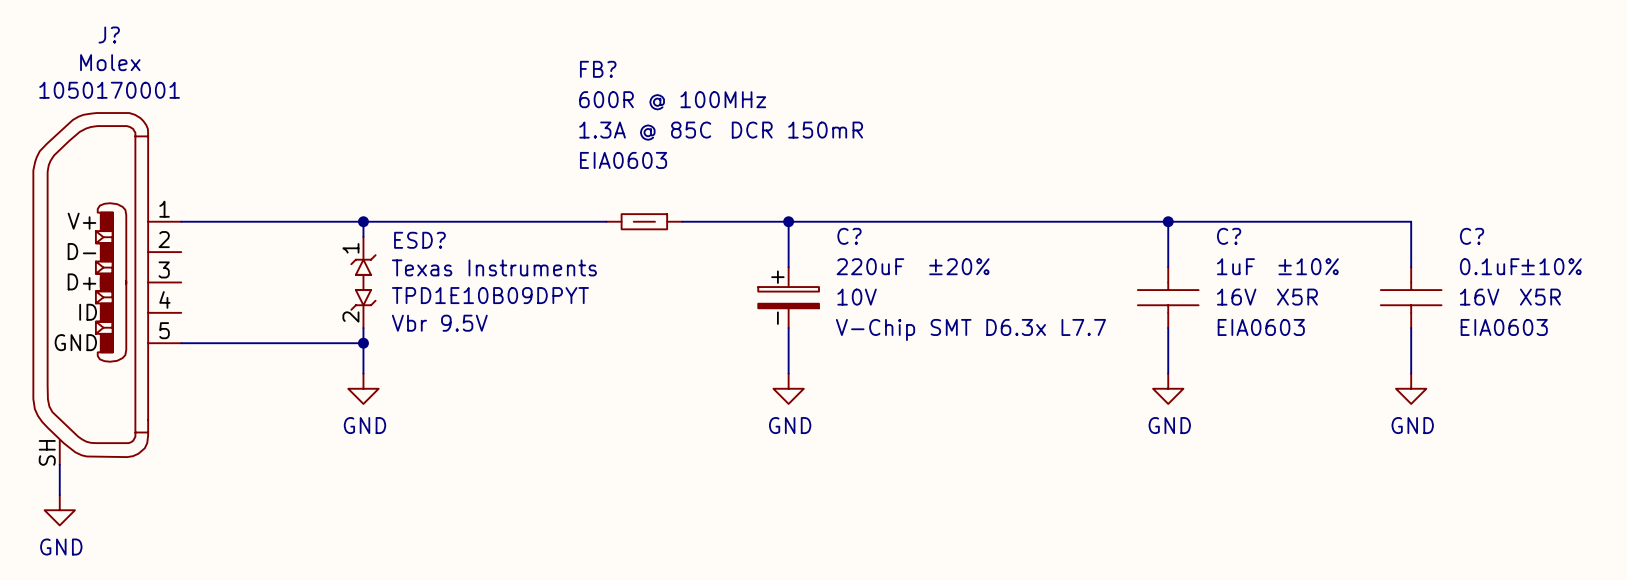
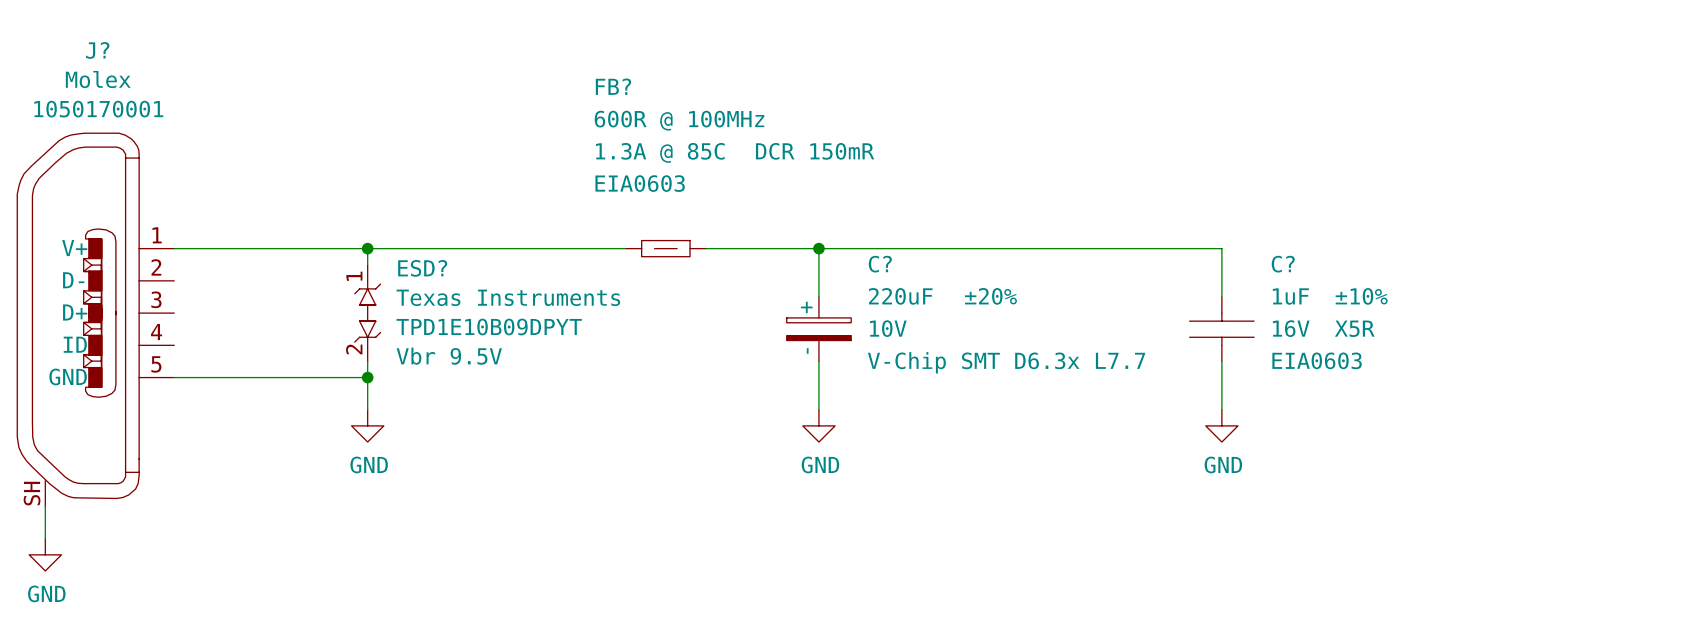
wire: (1168, 221) (1411, 221) (1411, 267) -> none
junction: (1168, 221) -> none
C?: (1411, 297) -> none
wire: (1411, 328) (1411, 373) -> none
power symbol: GND (1411, 388) -> none

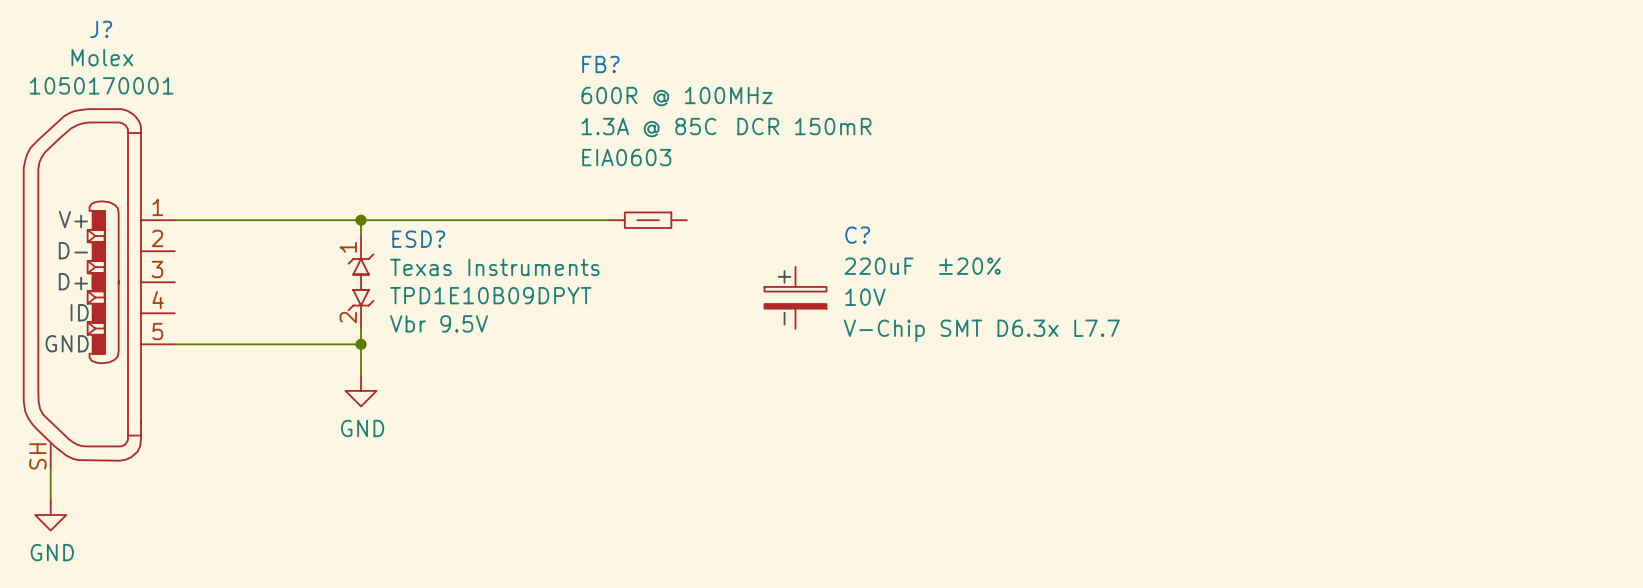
wire: (706, 248) (1221, 248) (1221, 296) -> none
wire: (818, 248) (818, 296) -> none
junction: (818, 248) -> none
C?: (1221, 329) -> none
wire: (818, 361) (818, 409) -> none
wire: (1221, 361) (1221, 409) -> none
power symbol: GND (818, 425) -> none
power symbol: GND (1221, 425) -> none

